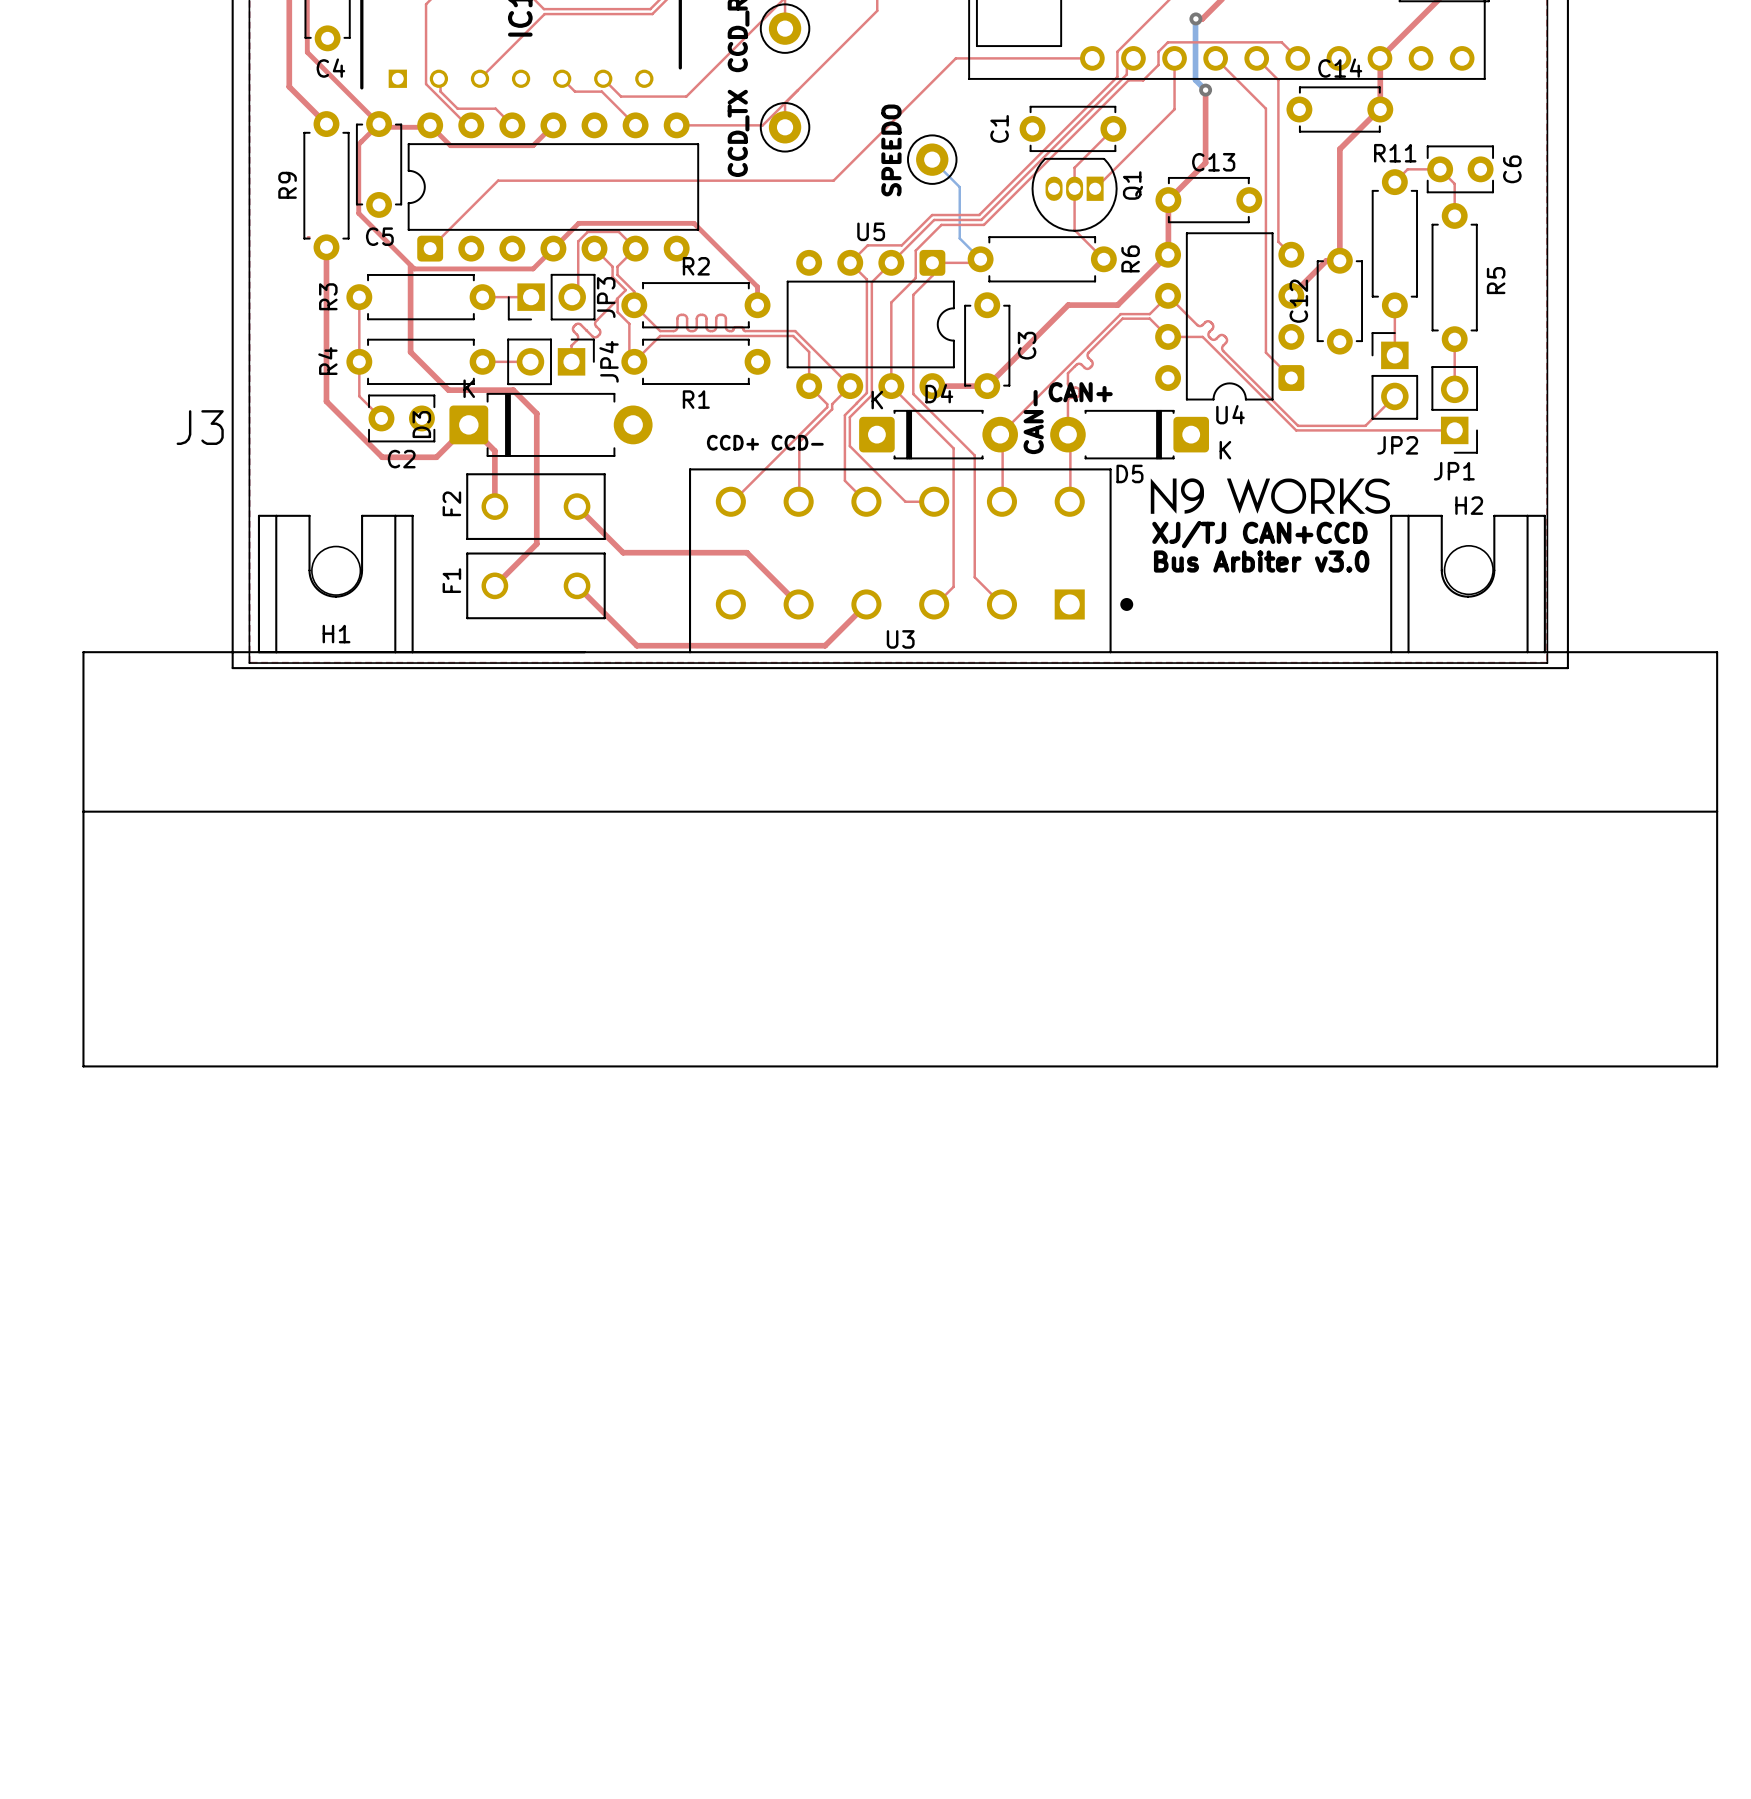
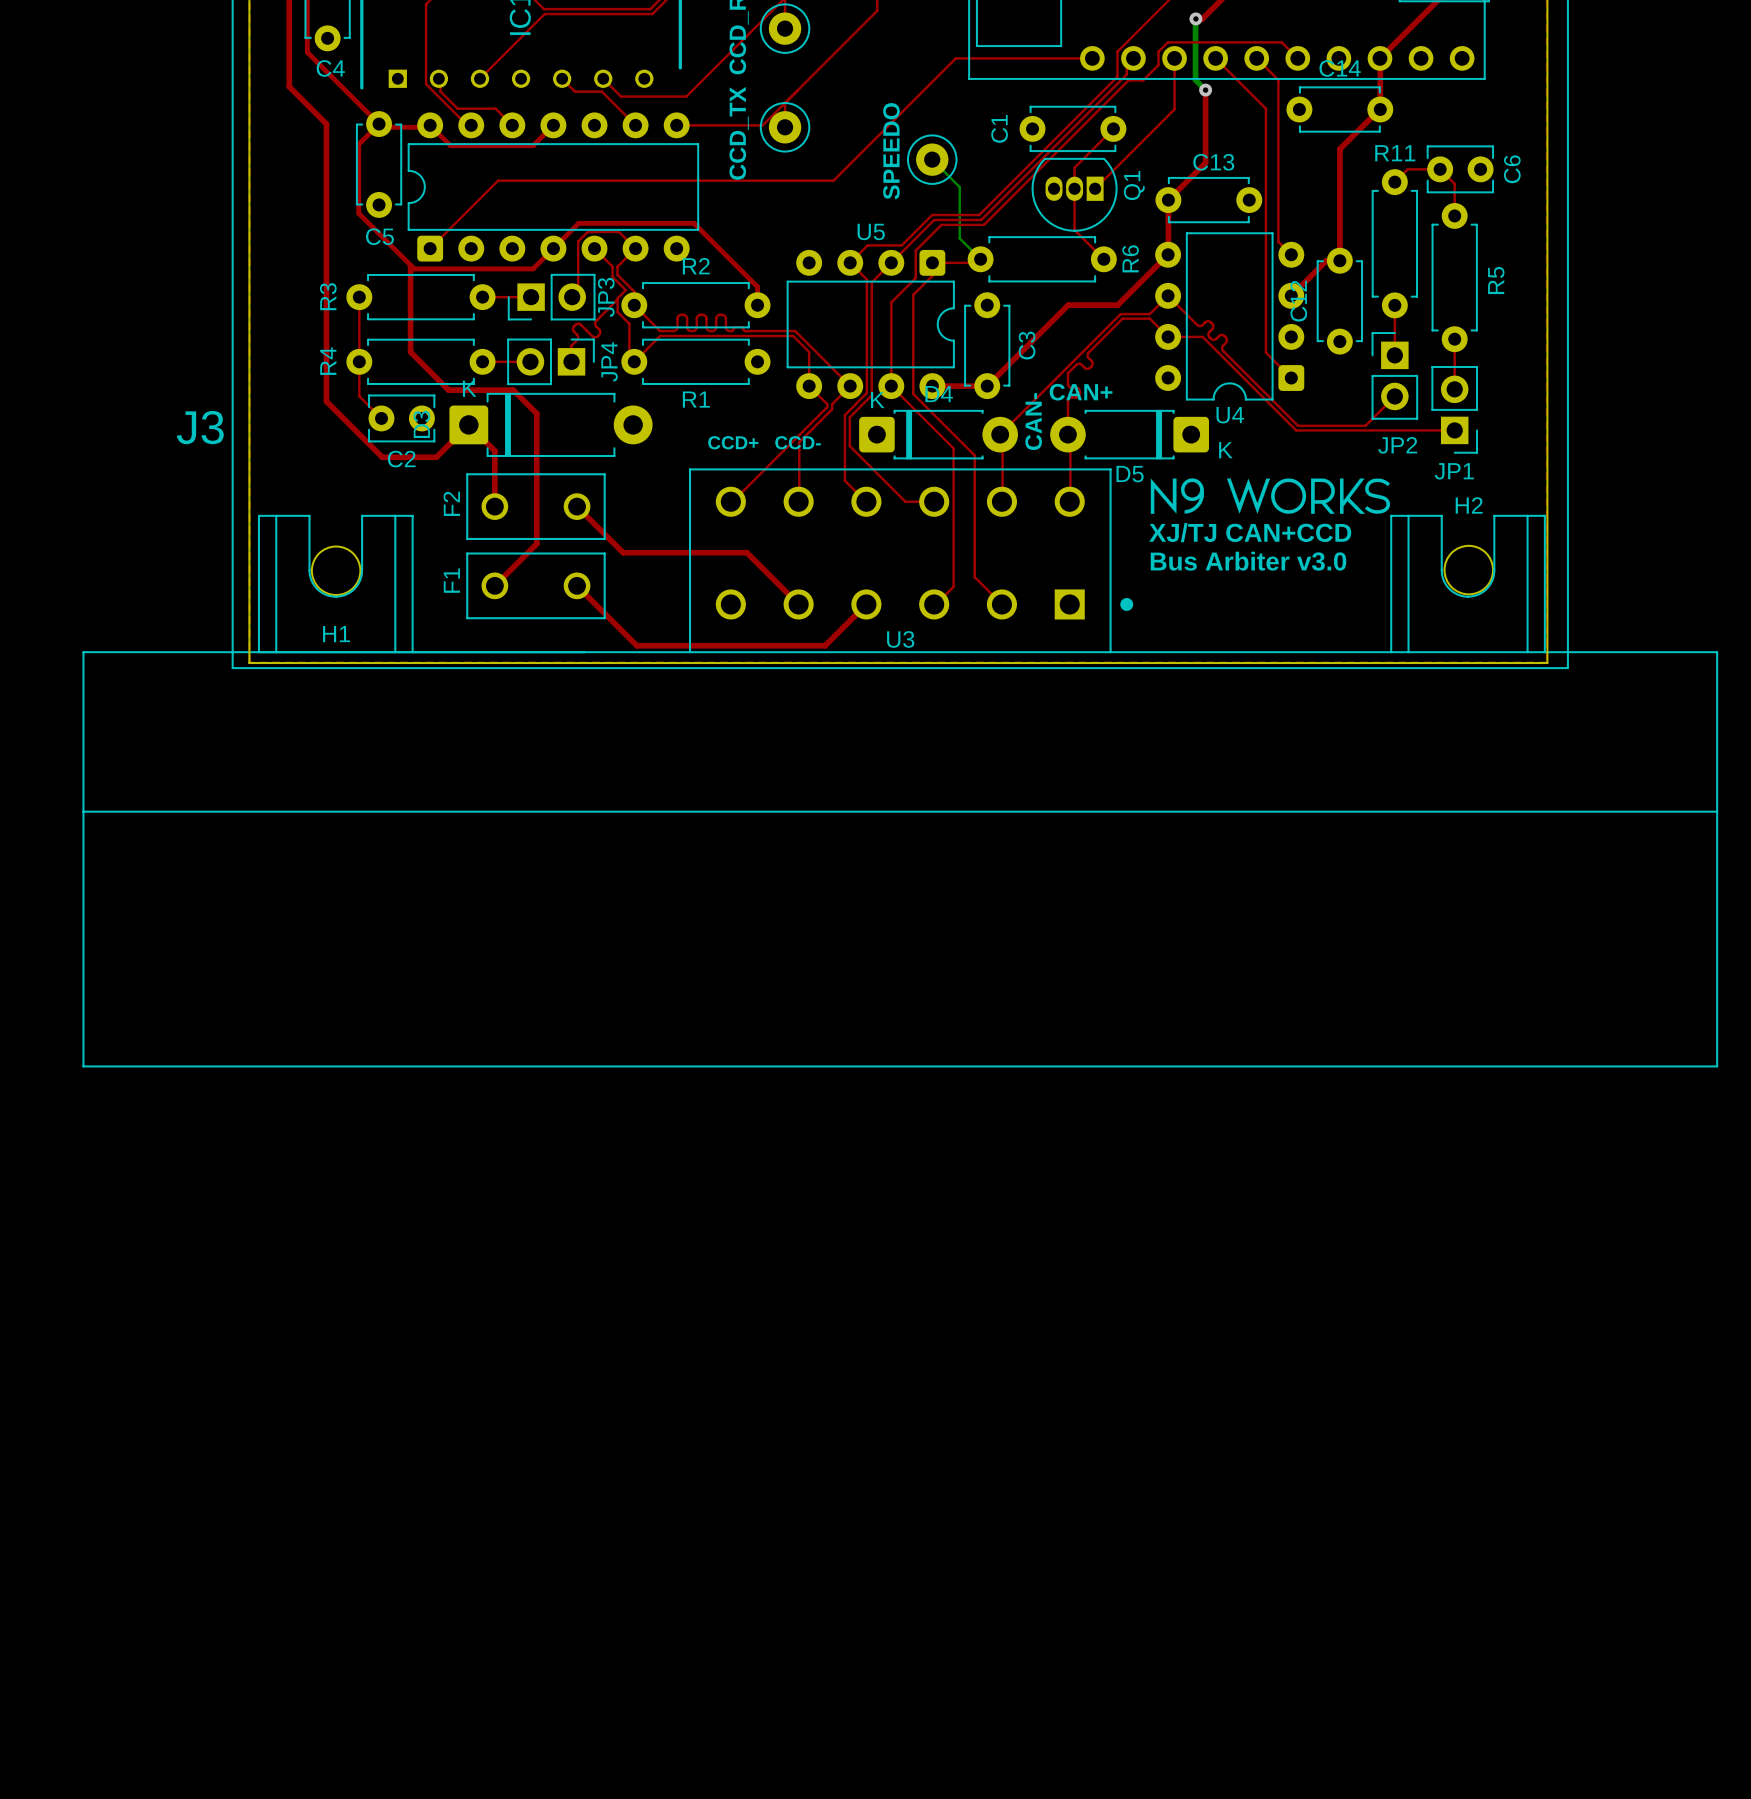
top track: none -> (326, 124) (326, 247)
R9: (326, 185) -> none
top track: (307, 237) (309, 237) -> none

